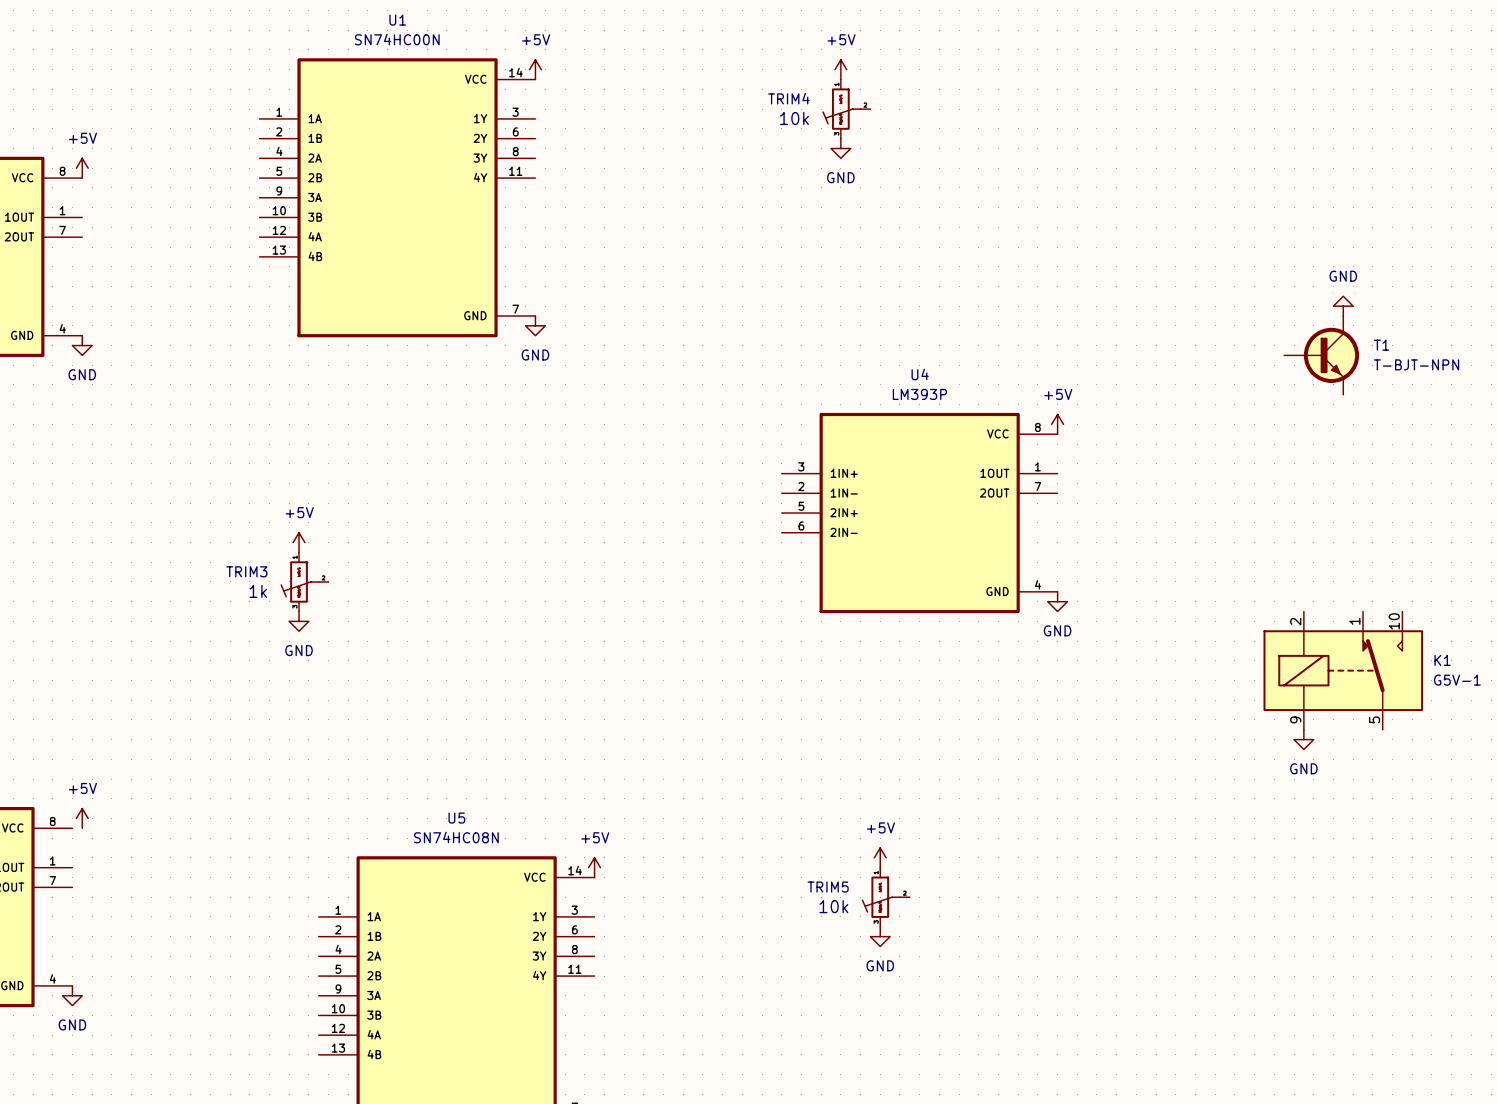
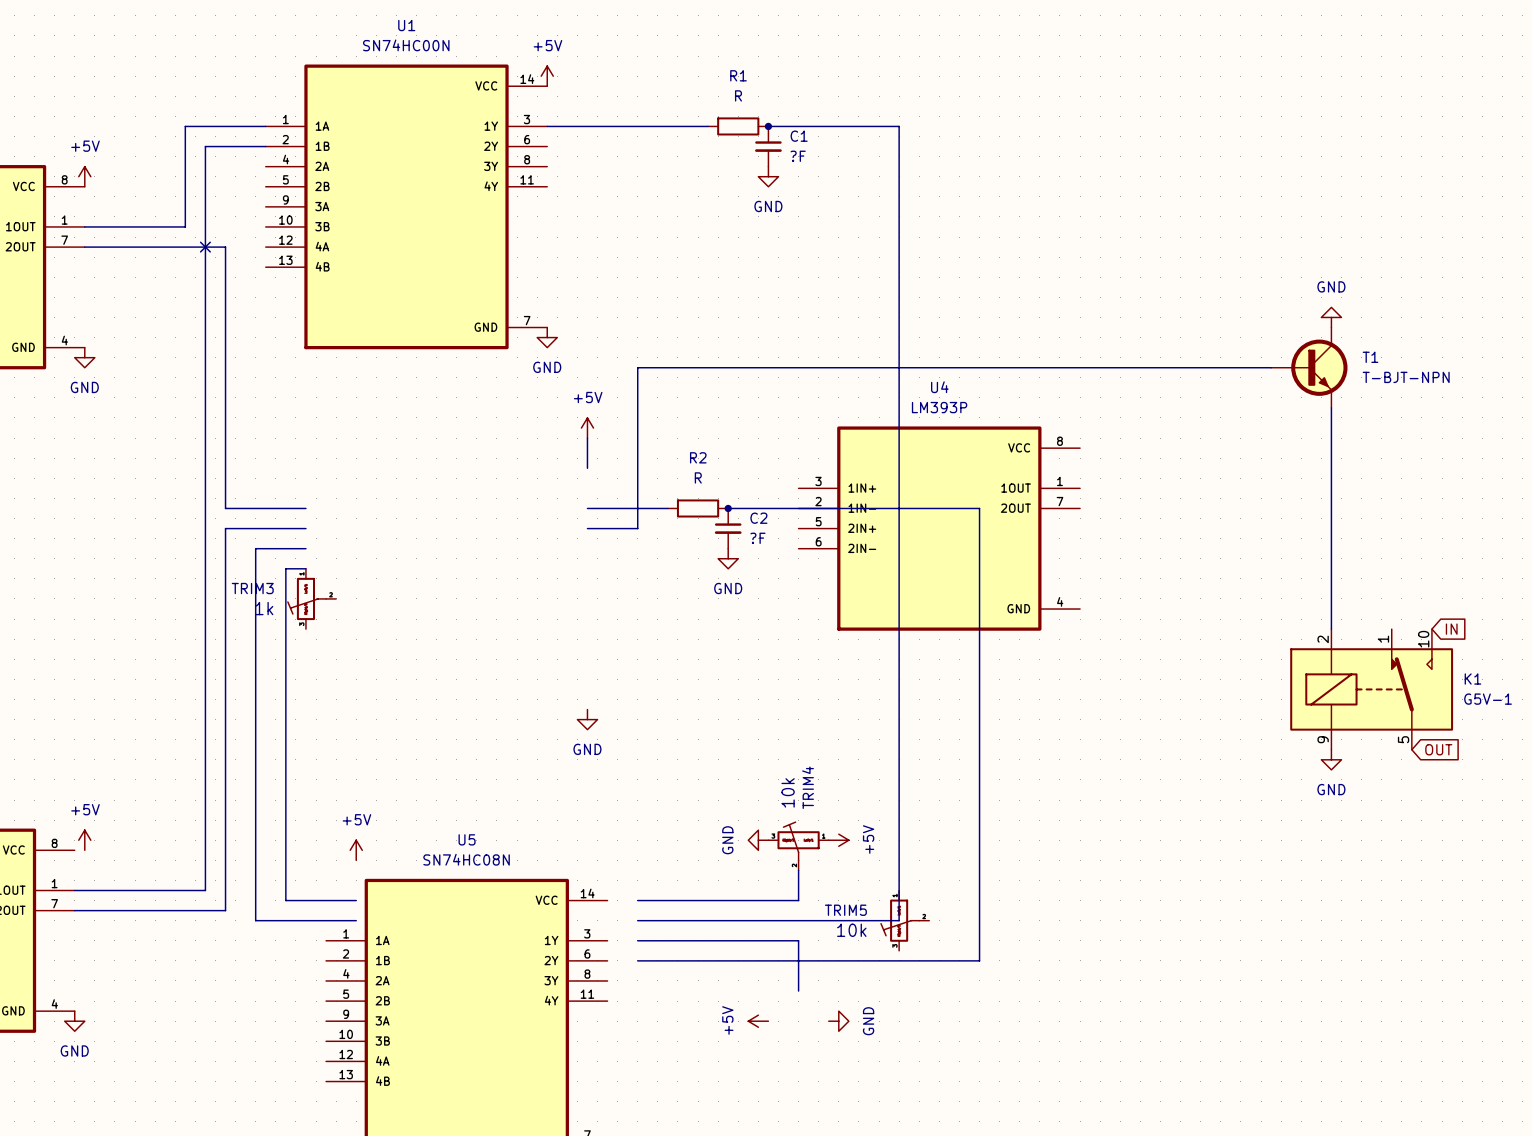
power symbol: +5V (840, 69) -> none
TRIM4 rotation: 0° (841, 109) -> 90° clockwise (798, 841)
TRIM4 position: (846, 109) -> (798, 846)
wire: none -> (265, 126) (185, 126) (185, 226) (84, 226)
wire: none -> (547, 126) (708, 126)
R1: none -> R (738, 126)
wire: none -> (768, 126) (899, 126) (899, 920) (637, 920)
junction: none -> (768, 126)
wire: none -> (265, 146) (205, 146) (205, 890) (74, 890)
C1: none -> (768, 146)
power symbol position: GND (840, 148) -> GND (768, 176)
wire: none -> (84, 247) (225, 247) (225, 508) (305, 508)
no-connect mark: none -> (205, 247)
power symbol position: GND (1343, 306) -> GND (1331, 317)
wire: none -> (1271, 367) (637, 367) (637, 528) (587, 528)
T1 position: (1321, 355) -> (1309, 367)
wire: none -> (1331, 407) (1331, 629)
power symbol: none -> +5V (587, 428)
wire: none -> (587, 438) (587, 468)
power symbol: +5V (1057, 424) -> none
wire: none -> (587, 508) (667, 508)
R2: none -> R (698, 508)
wire: none -> (728, 508) (979, 508) (979, 960) (637, 960)
junction: none -> (728, 508)
wire: none -> (305, 528) (225, 528) (225, 910) (74, 910)
C2: none -> (728, 528)
wire: none -> (305, 548) (255, 548) (255, 920) (356, 920)
power symbol: +5V (299, 542) -> none
power symbol: none -> GND (728, 558)
wire: none -> (305, 568) (285, 568) (285, 900) (356, 900)
power symbol: GND (1057, 601) -> none
global label: none -> IN (1451, 629)
power symbol: GND (299, 621) -> none
power symbol: none -> GND (587, 719)
global label: none -> OUT (1438, 749)
power symbol: none -> GND (758, 840)
power symbol: none -> +5V (356, 850)
wire: none -> (798, 870) (798, 900) (637, 900)
power symbol rotation: 0° (880, 857) -> 90° clockwise (838, 840)
power symbol position: +5V (880, 857) -> +5V (838, 840)
power symbol: +5V (594, 867) -> none
wire: none -> (637, 940) (798, 940) (798, 991)
power symbol rotation: 0° (880, 936) -> 90° counterclockwise (838, 1021)
power symbol position: GND (880, 936) -> GND (838, 1021)
power symbol: none -> +5V (758, 1021)

